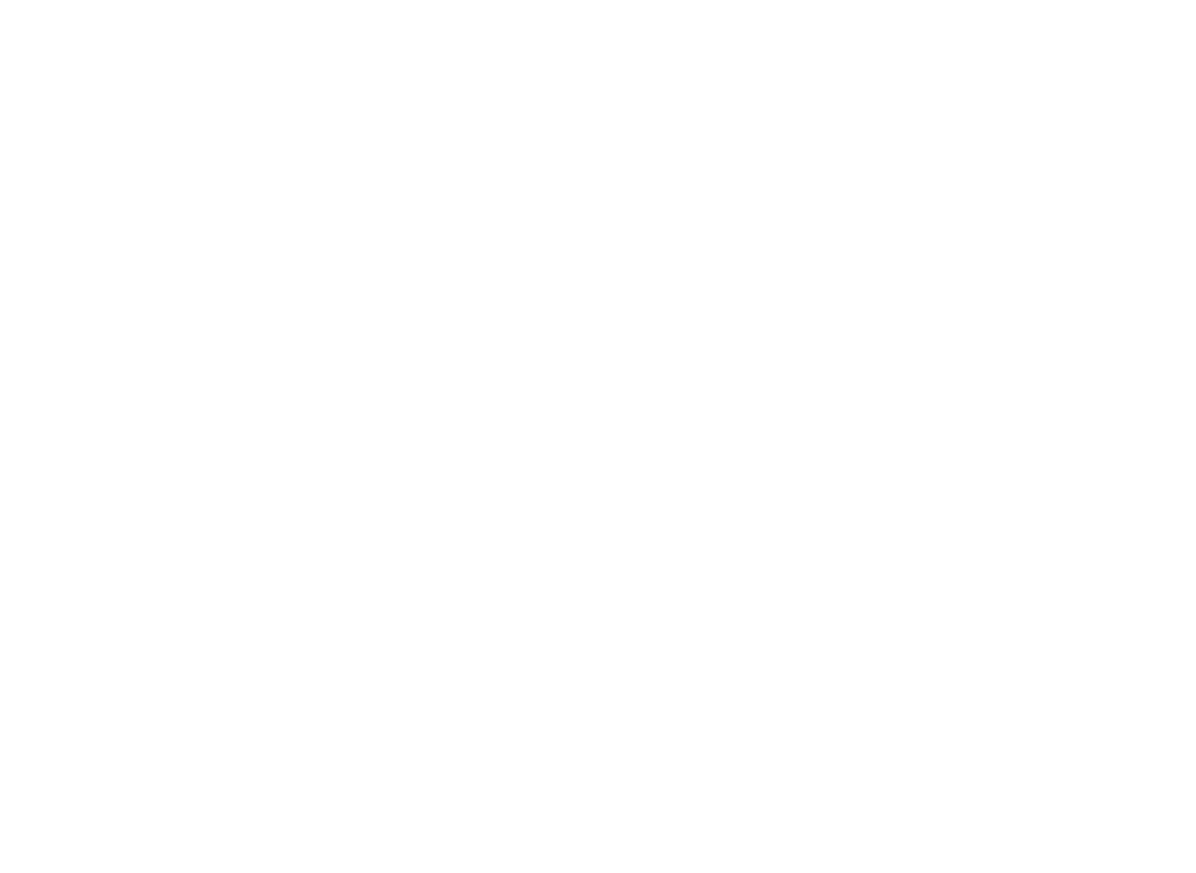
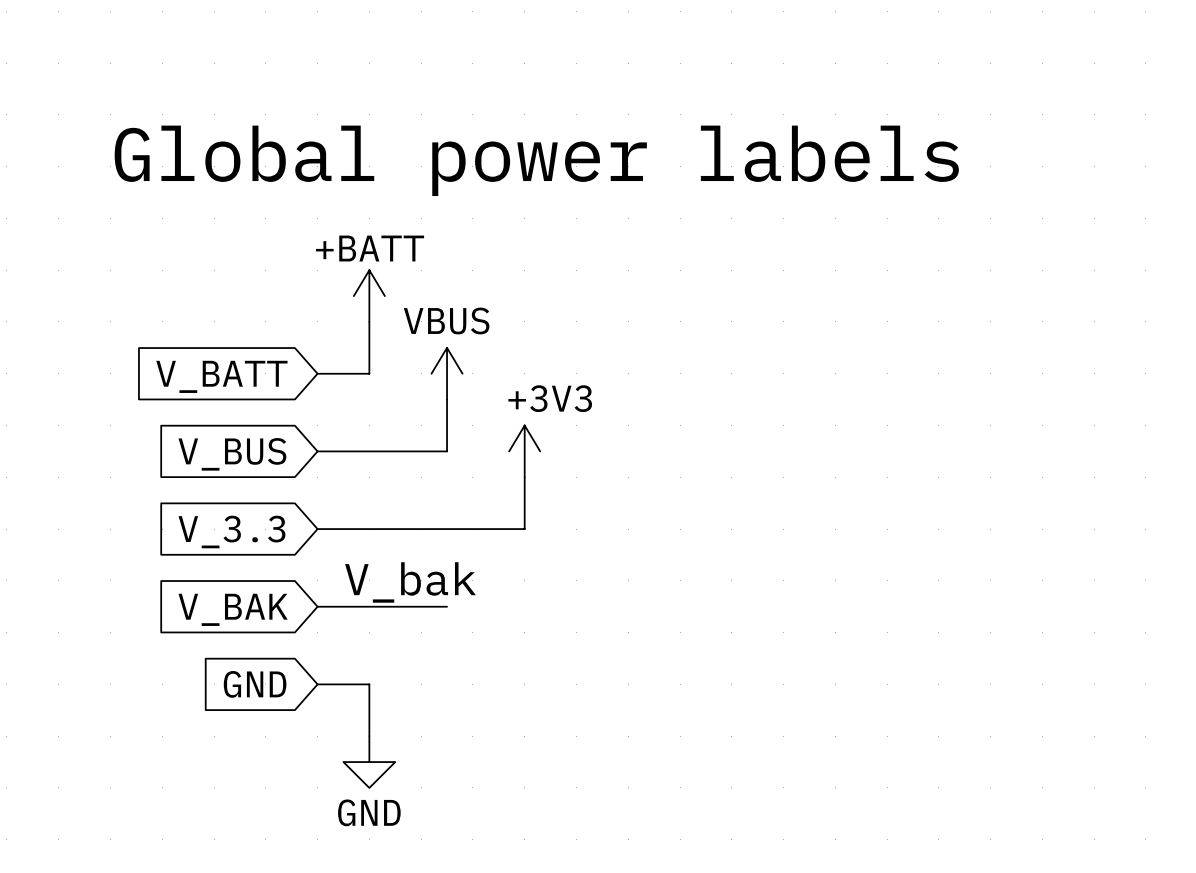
text: none -> Global power labels (536, 160)
power symbol: none -> +BATT (369, 296)
wire: none -> (369, 321) (369, 373) (317, 373)
power symbol: none -> VBUS (447, 373)
global label: none -> V_BATT (221, 376)
wire: none -> (447, 399) (447, 451) (317, 451)
power symbol: none -> +3V3 (524, 451)
global label: none -> V_BUS (232, 454)
wire: none -> (524, 477) (524, 529) (317, 529)
global label: none -> V_3.3 (231, 531)
label: none -> V_bak (410, 582)
wire: none -> (317, 606) (447, 606)
global label: none -> V_BAK (233, 609)
global label: none -> GND (255, 684)
wire: none -> (317, 684) (369, 684) (369, 736)
power symbol: none -> GND (369, 762)

